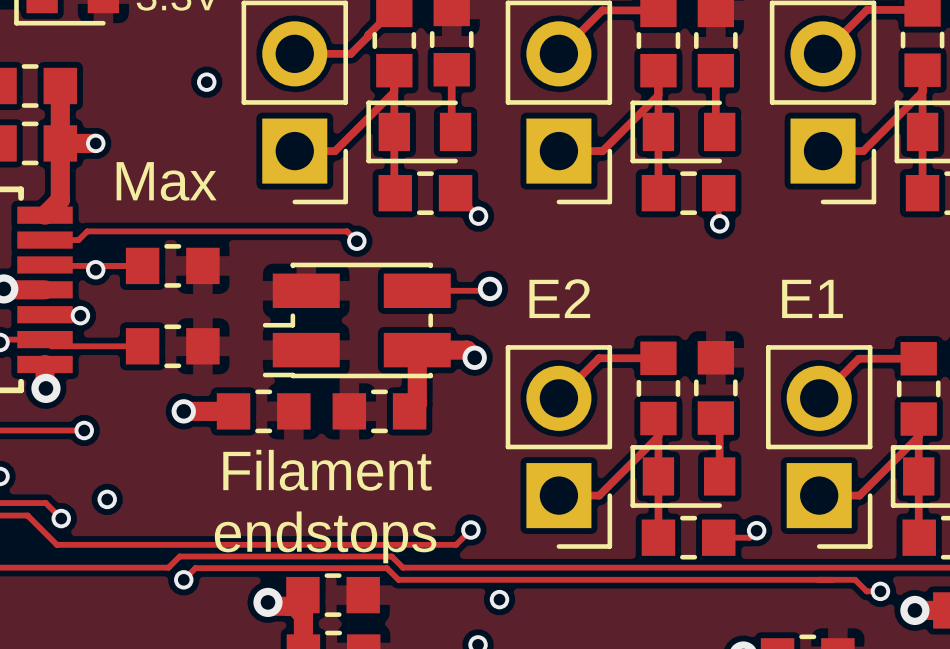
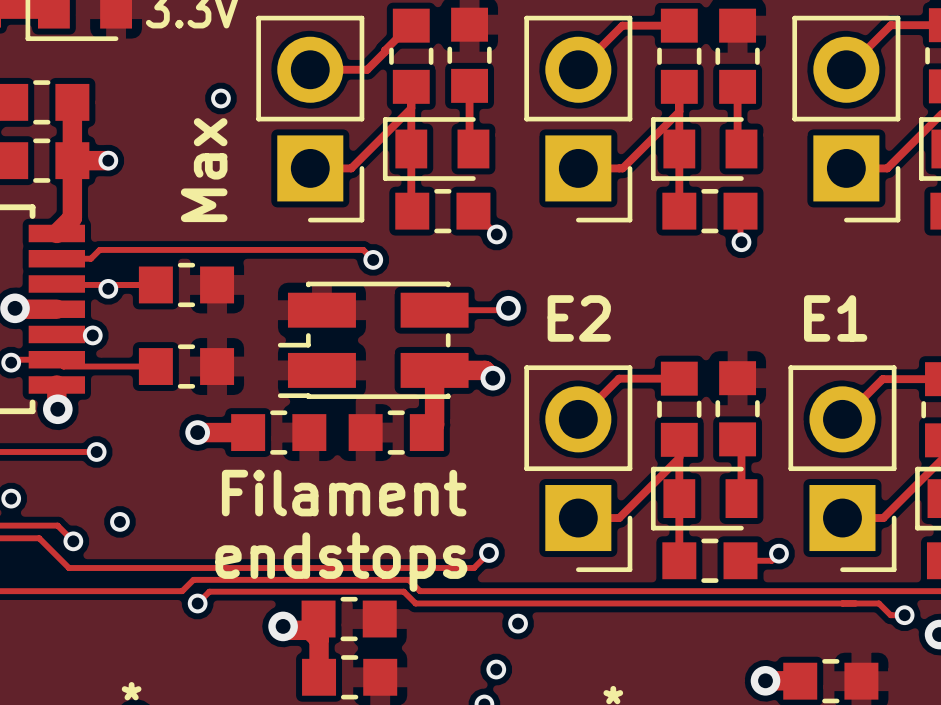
text rotation: 0° (166, 181) -> 90° counterclockwise (204, 170)

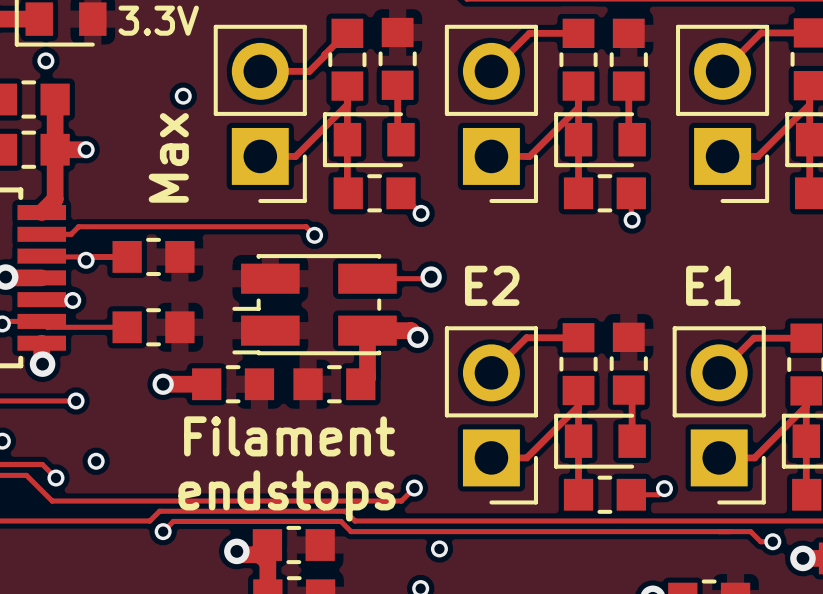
via: none -> (45, 60)

